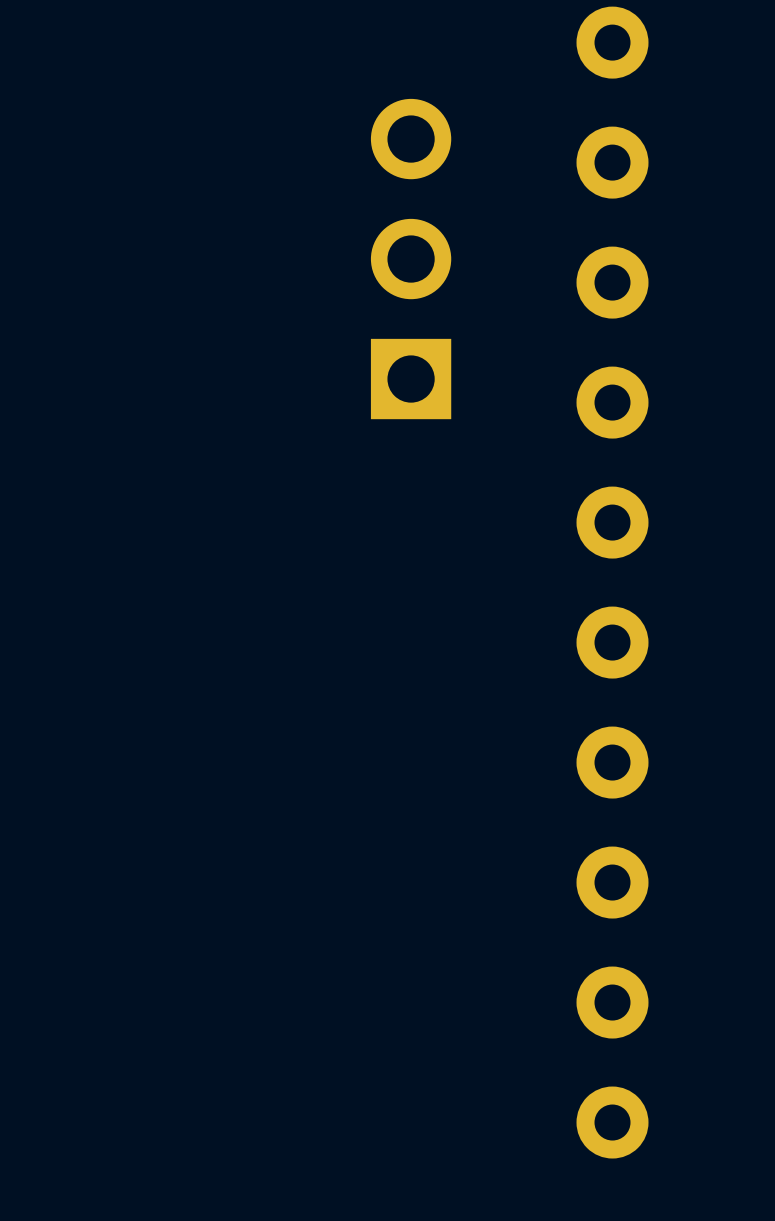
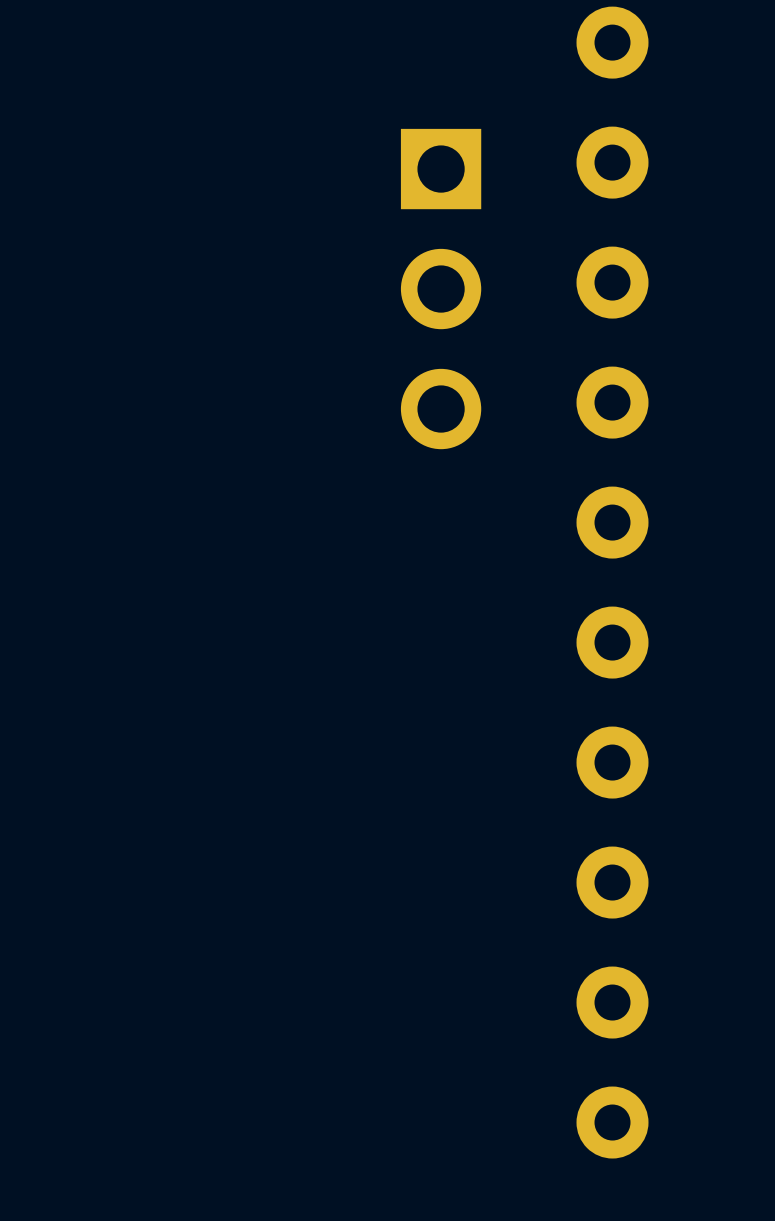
part rotation: 0° (411, 259) -> 180° (441, 289)

